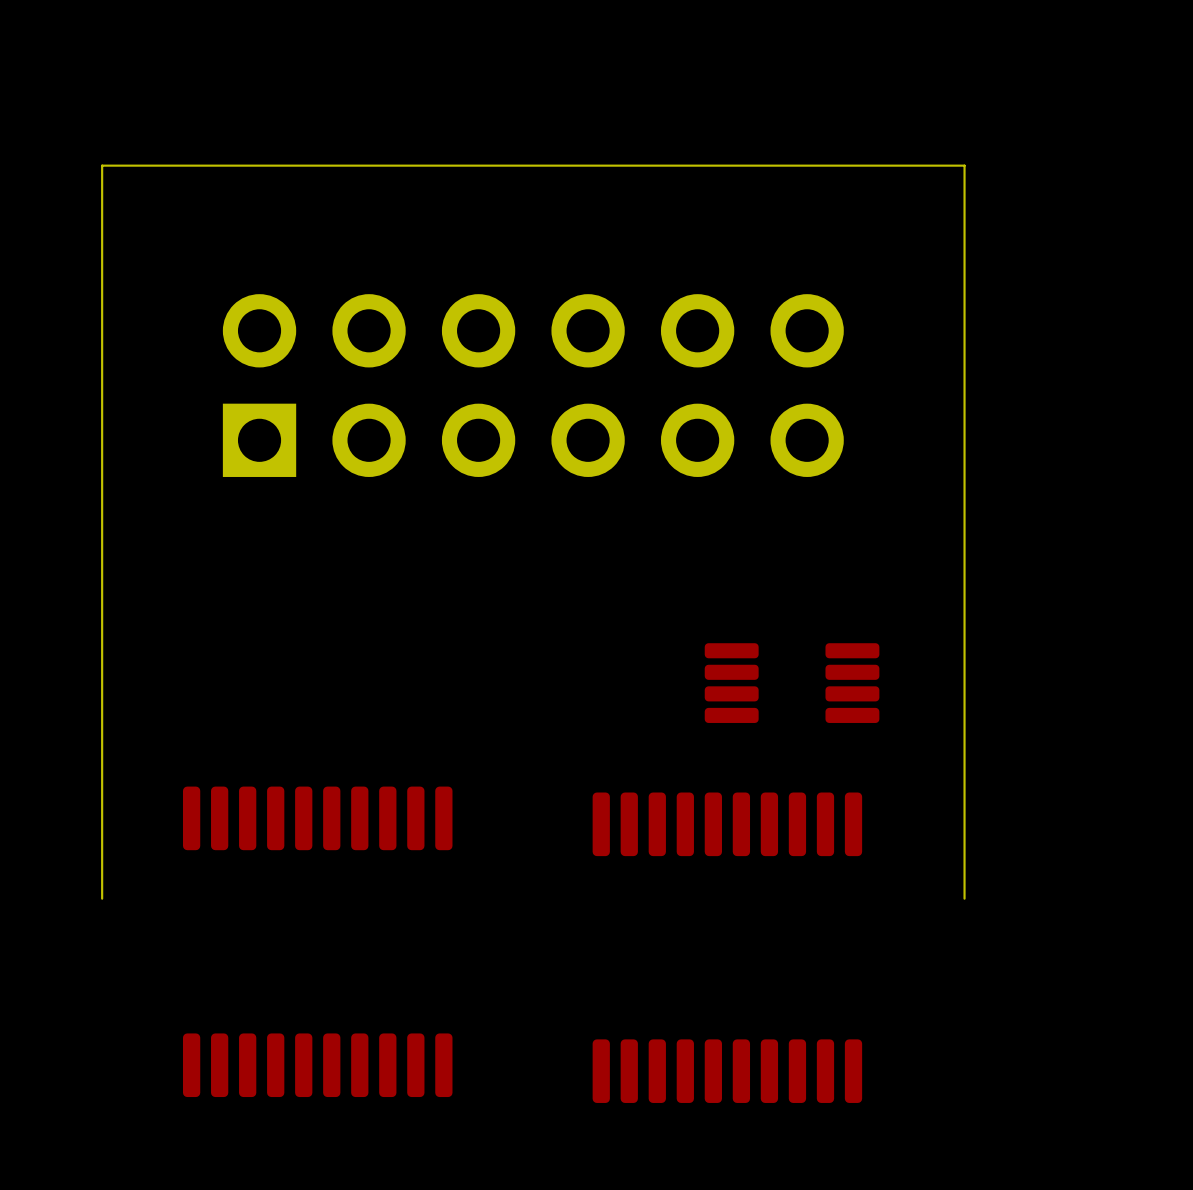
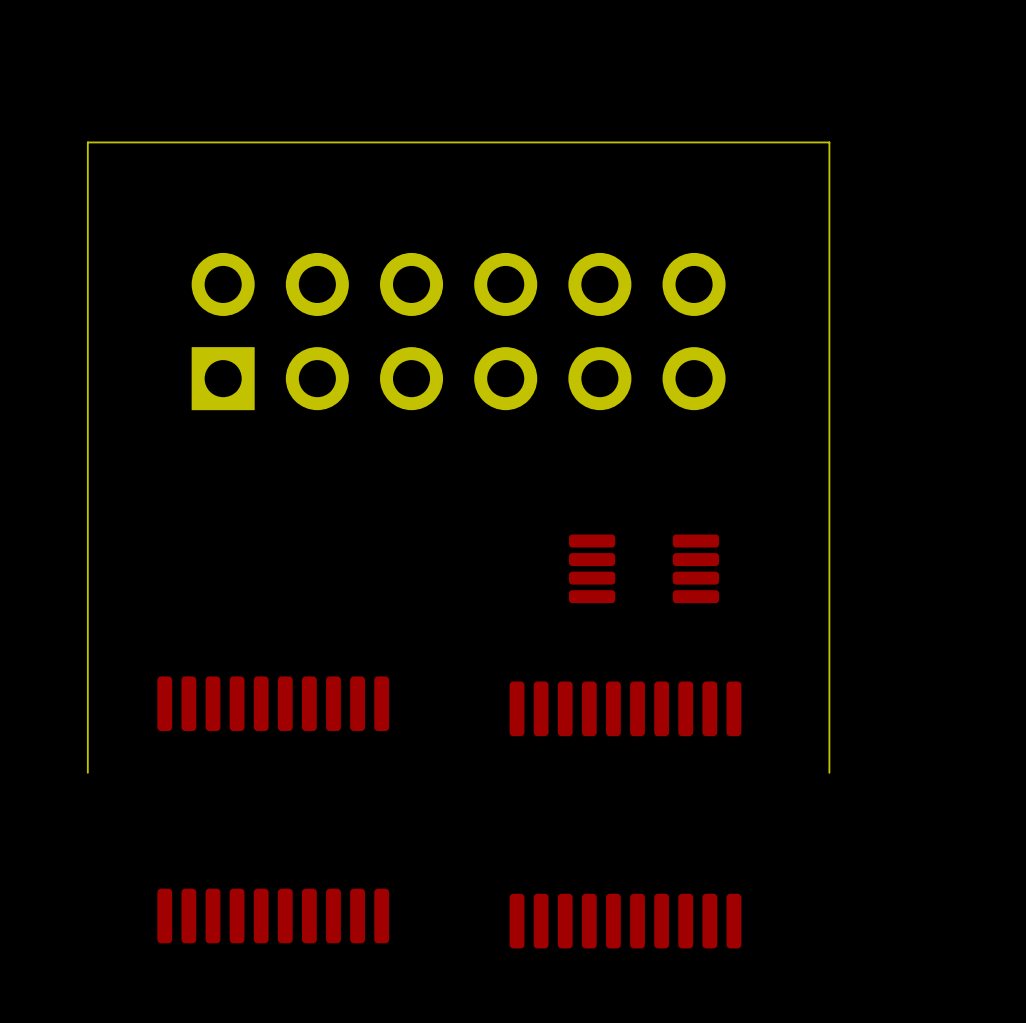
part position: (792, 683) -> (644, 568)

